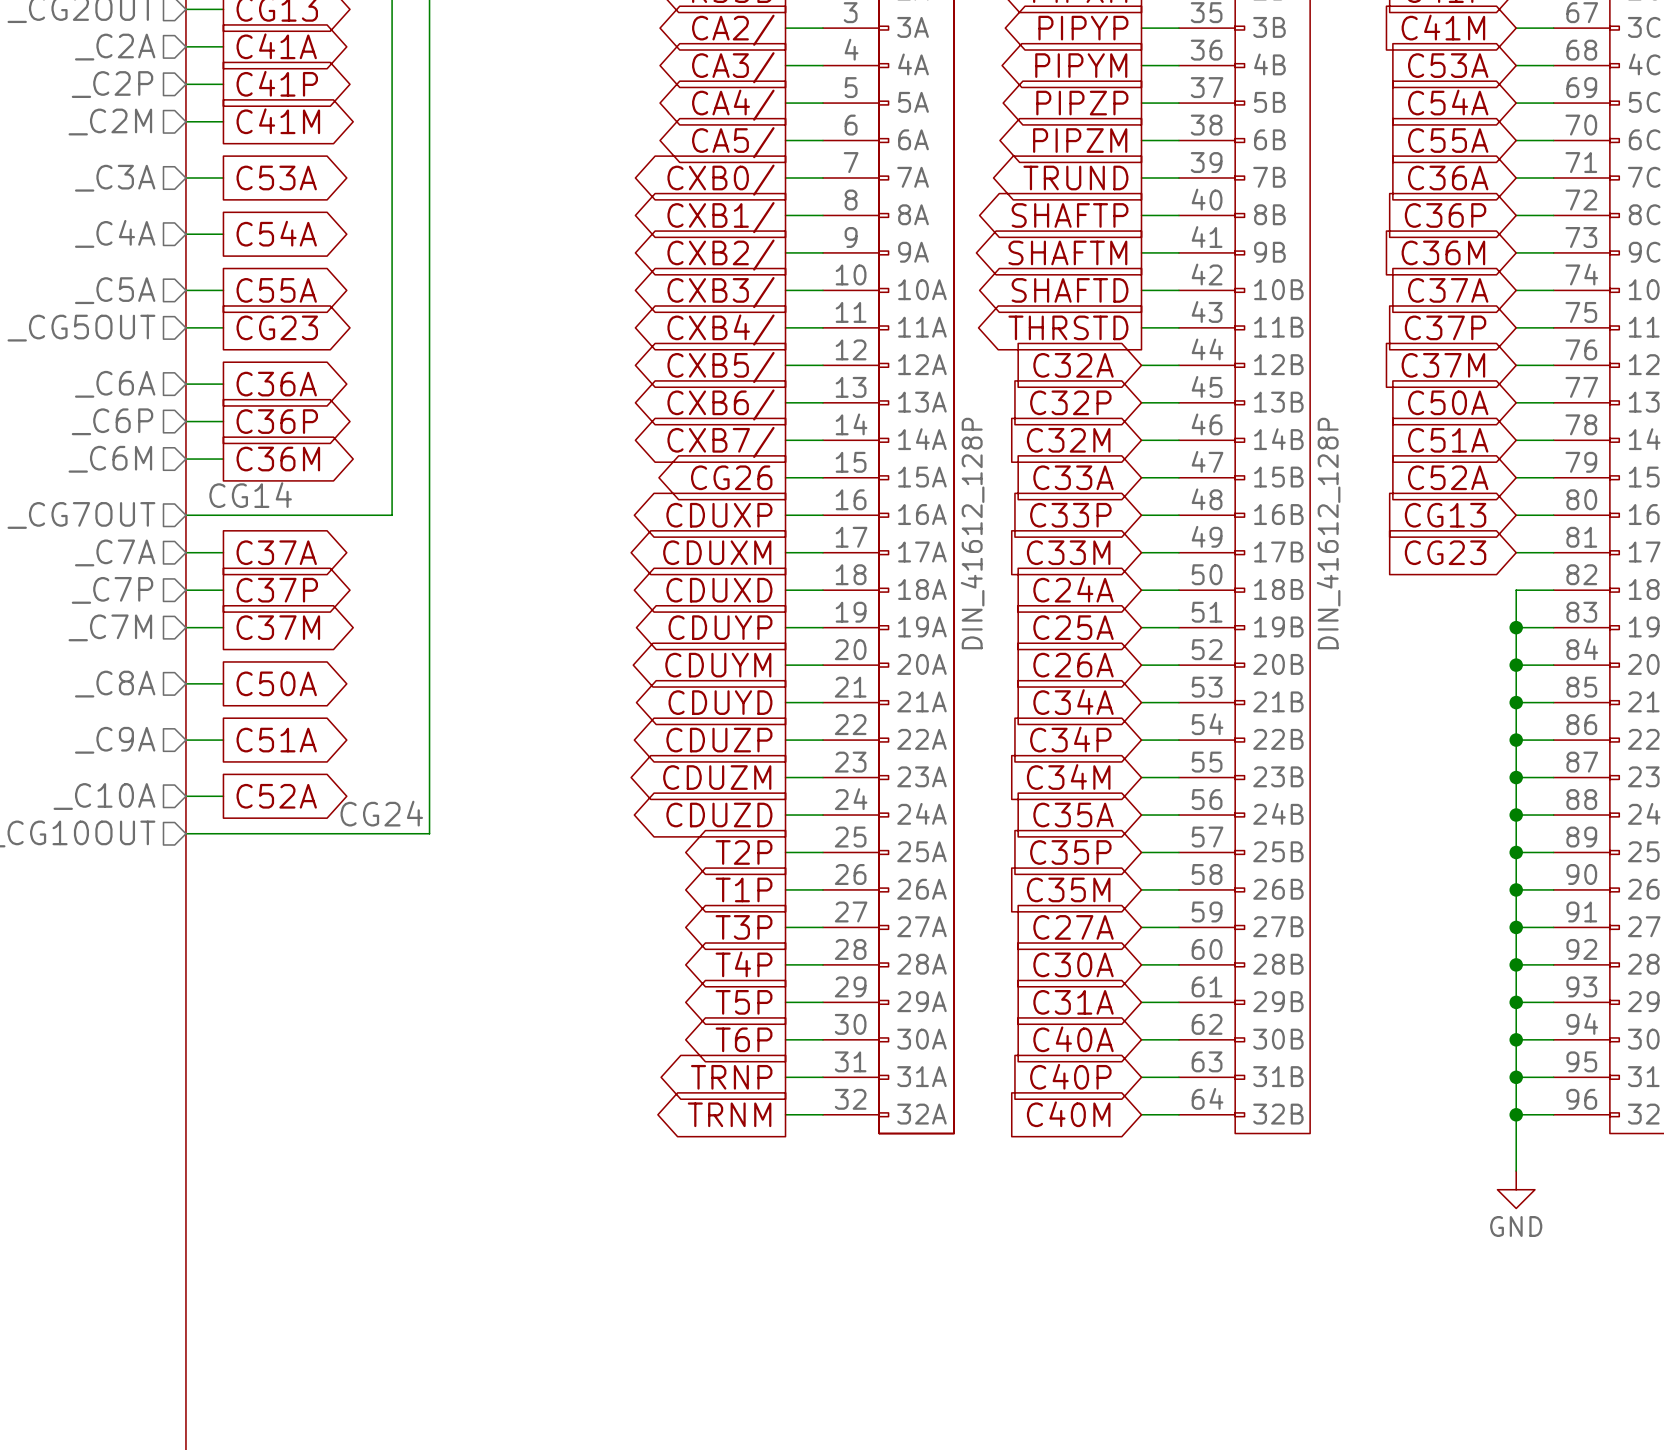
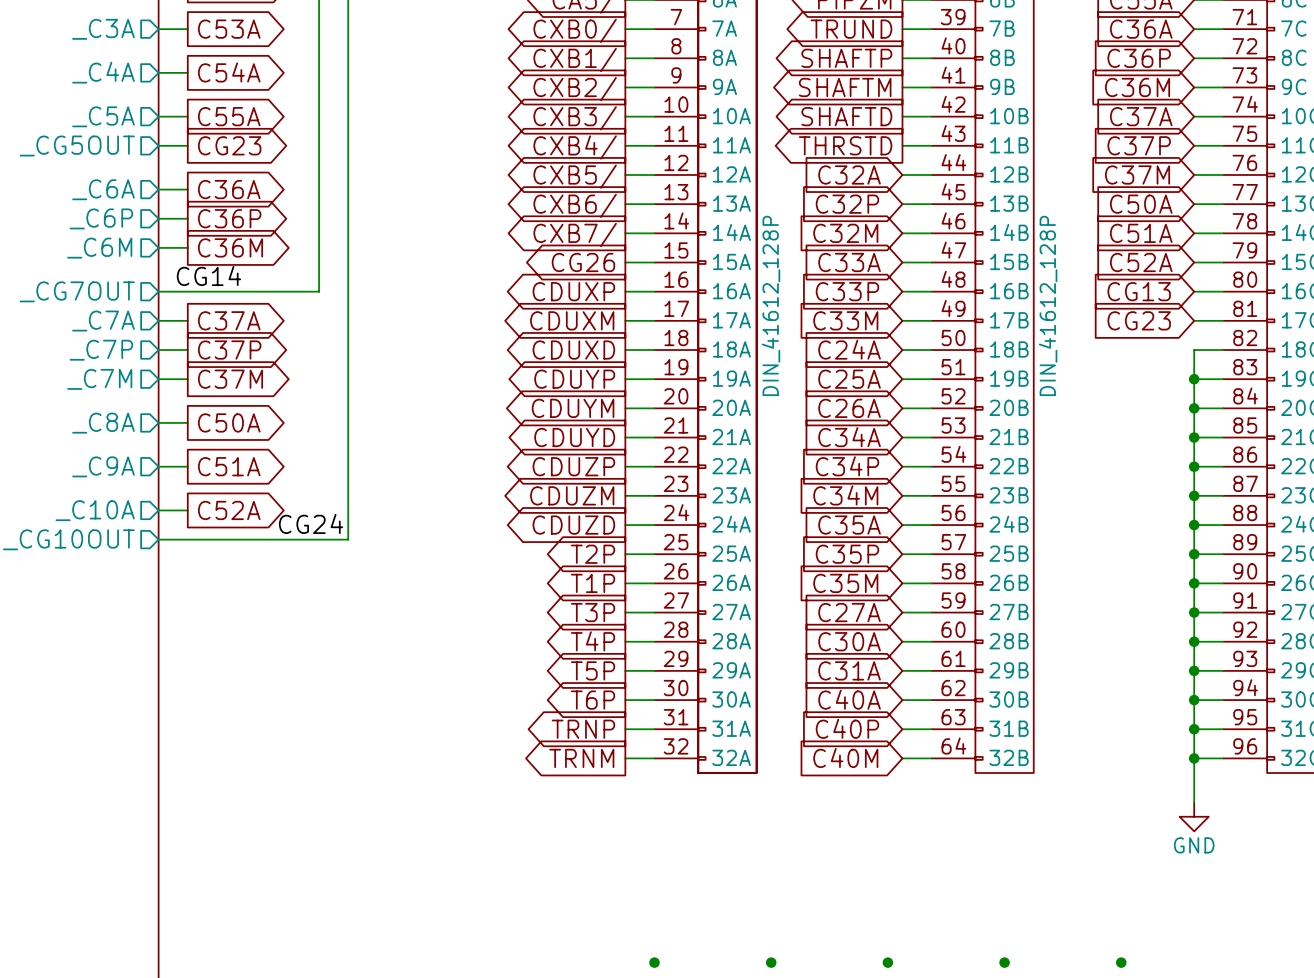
junction: none -> (654, 962)
junction: none -> (771, 962)
junction: none -> (887, 962)
junction: none -> (1004, 962)
junction: none -> (1121, 962)

